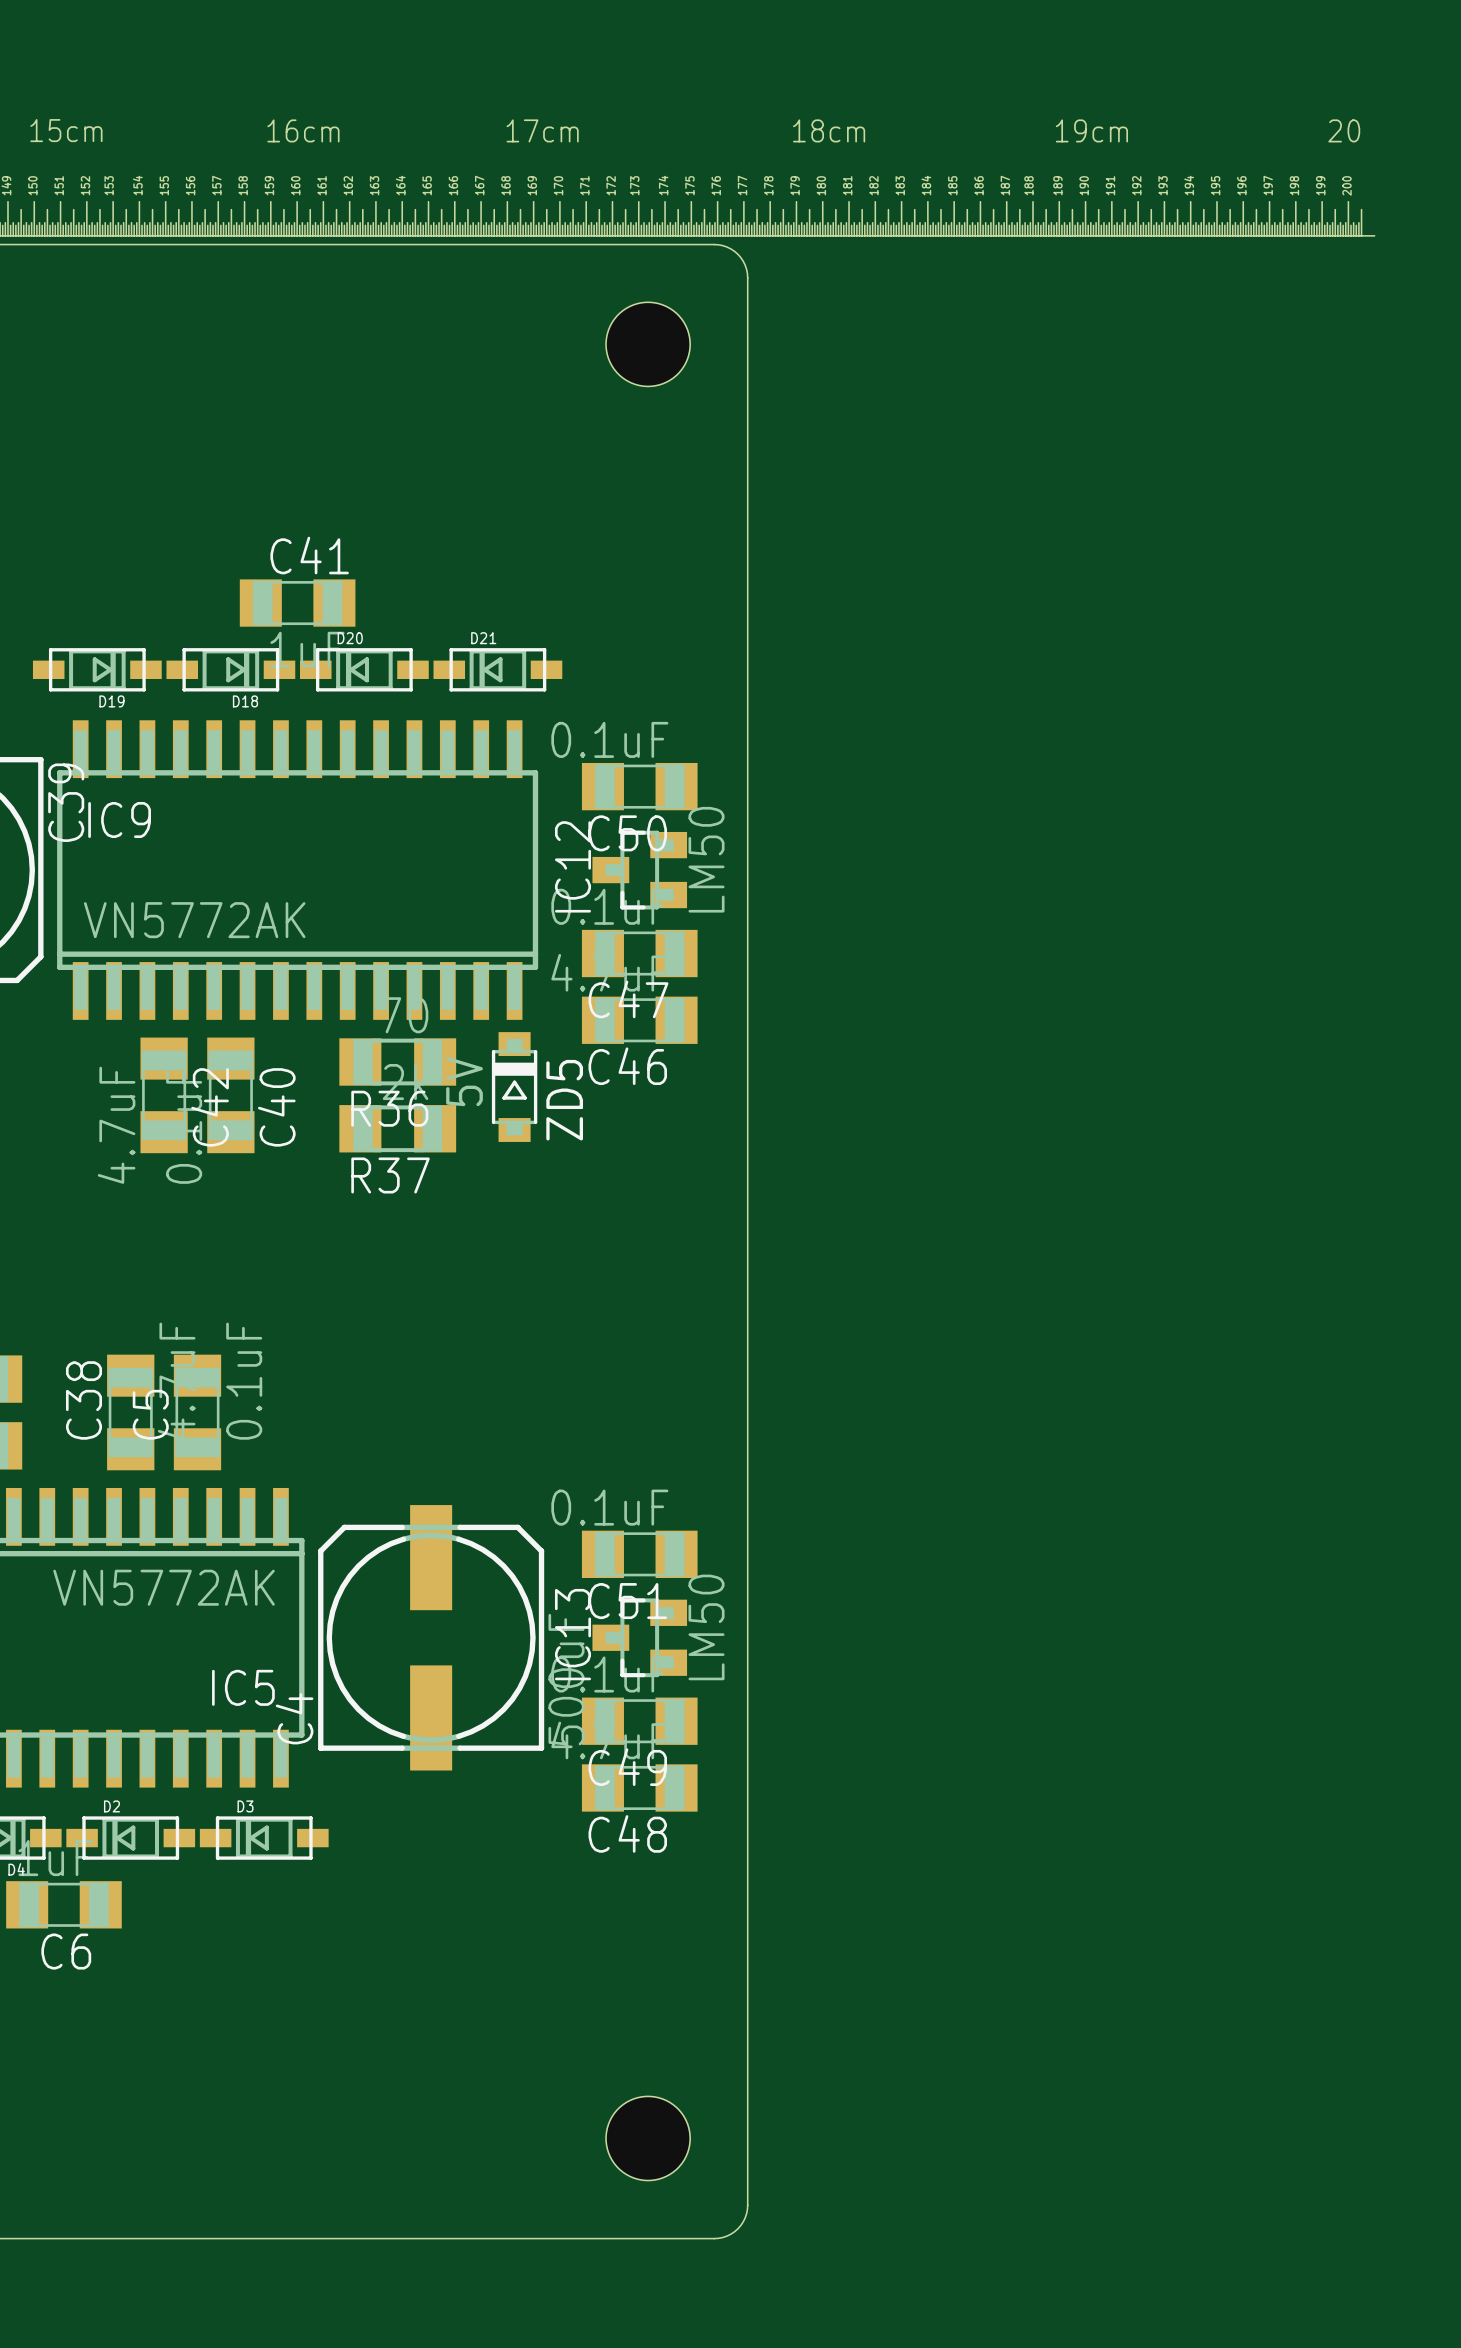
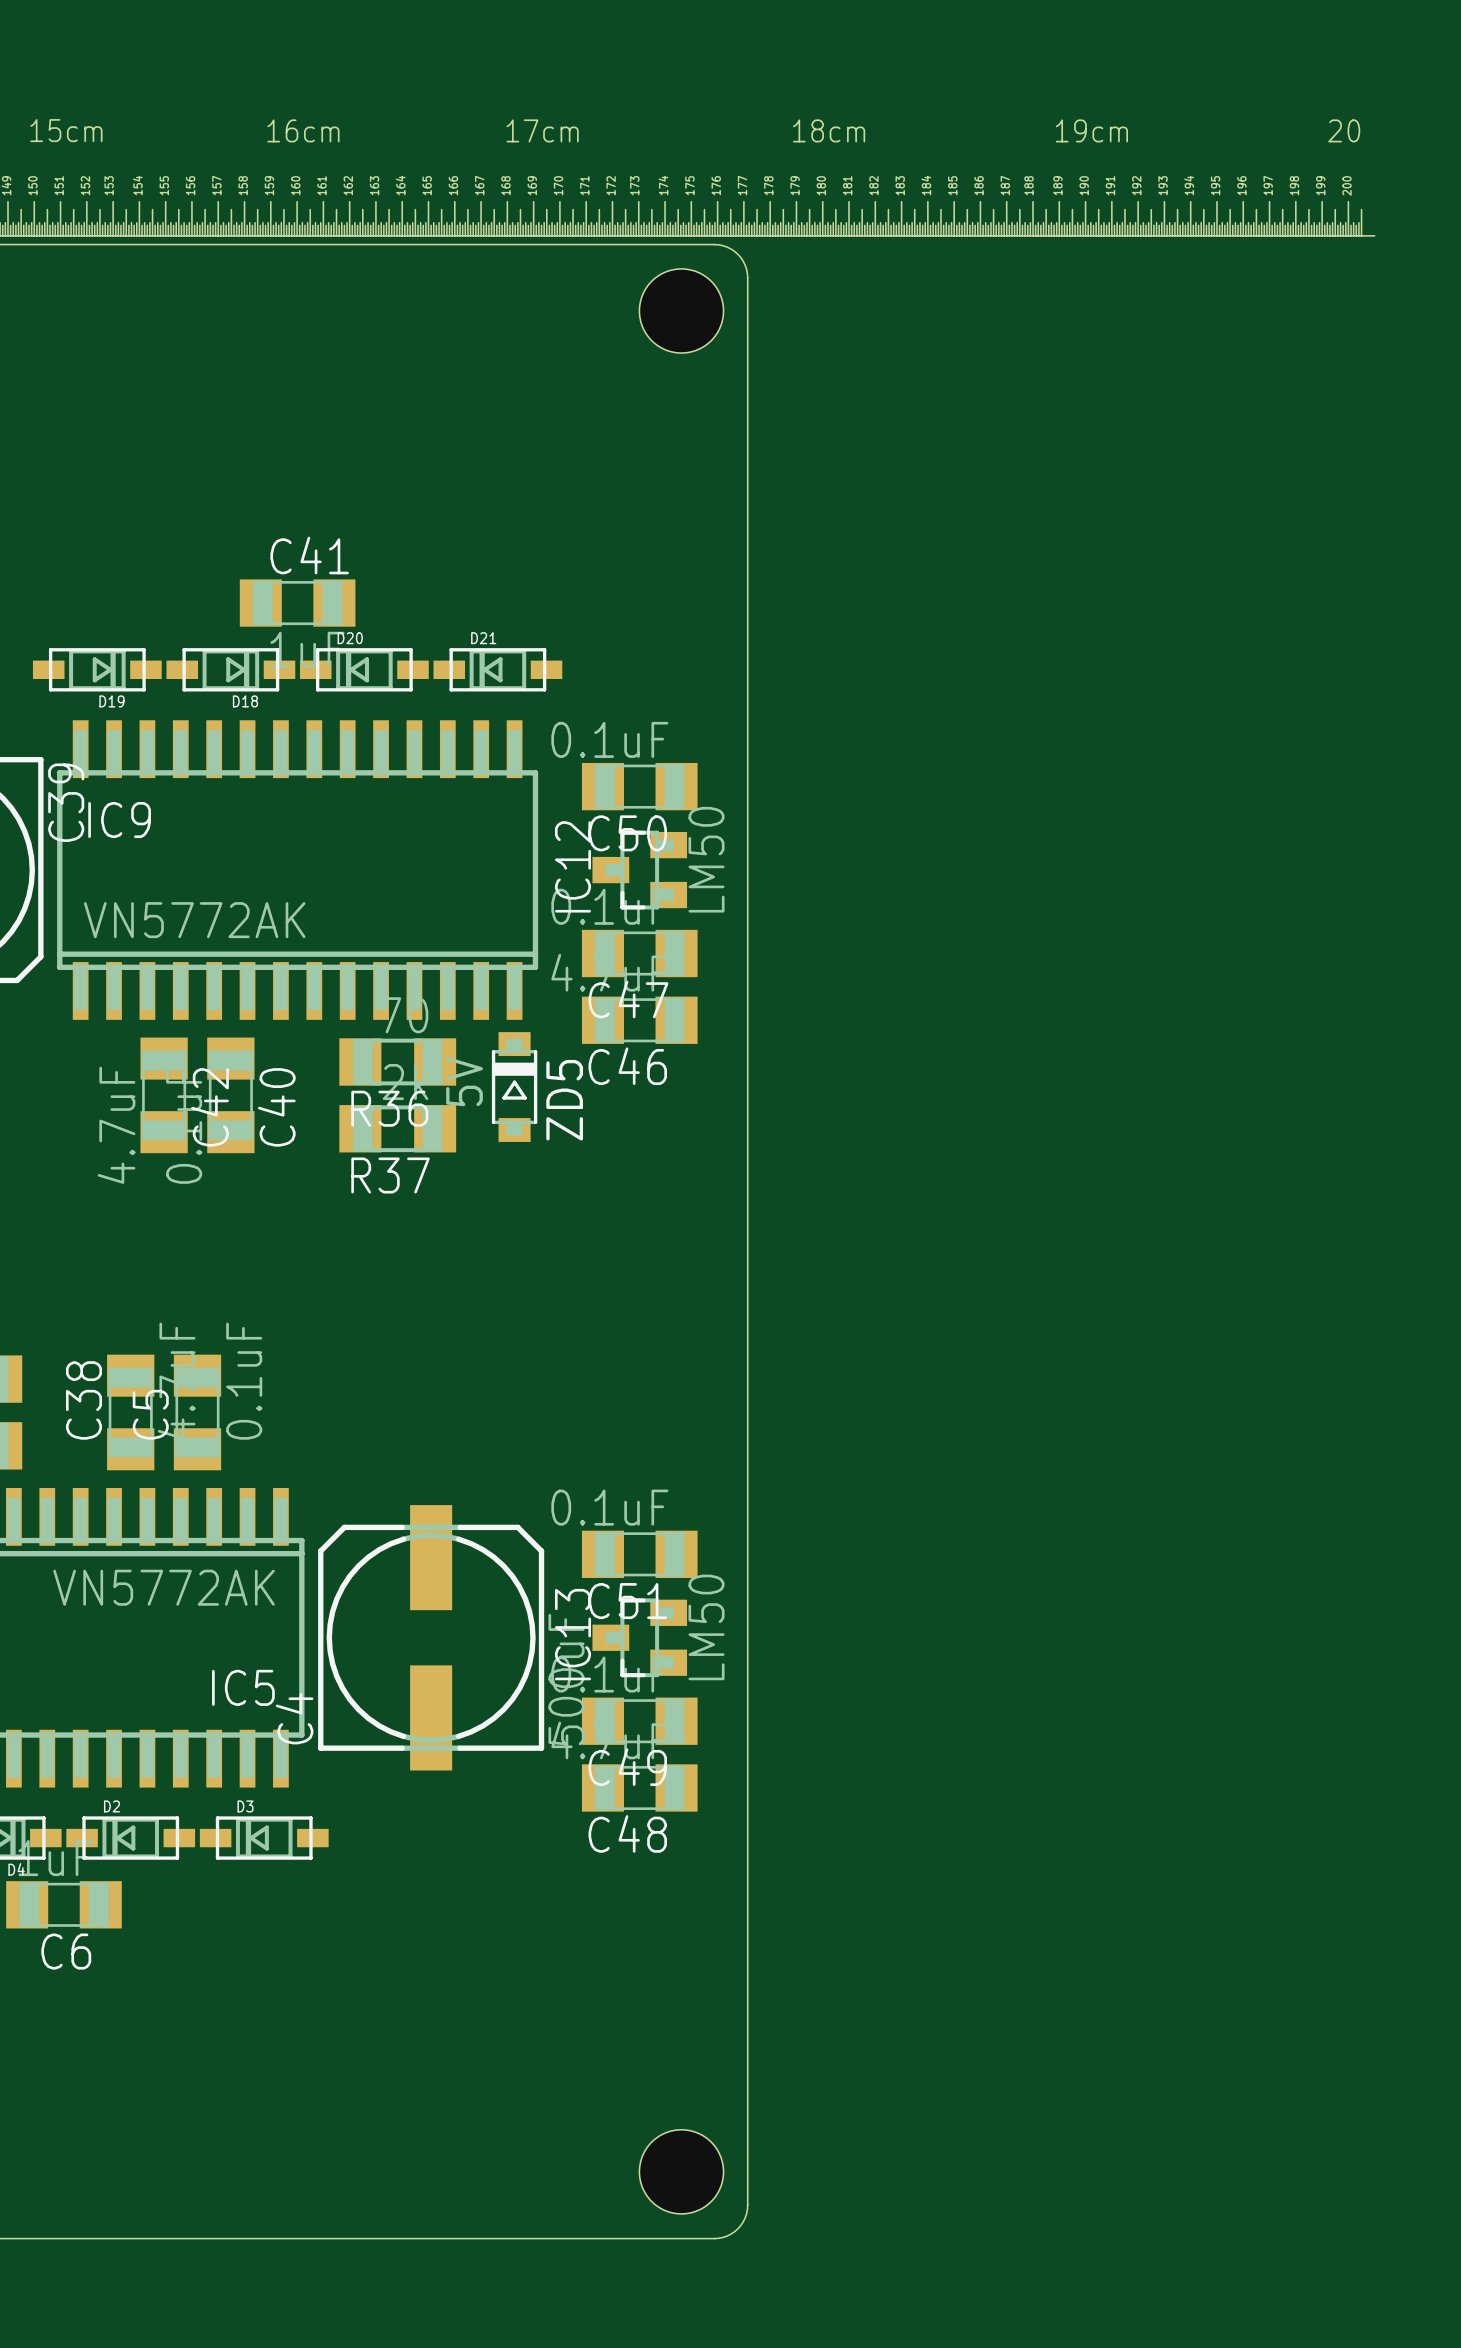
hole position: (648, 344) -> (681, 310)
hole position: (648, 2138) -> (681, 2171)

